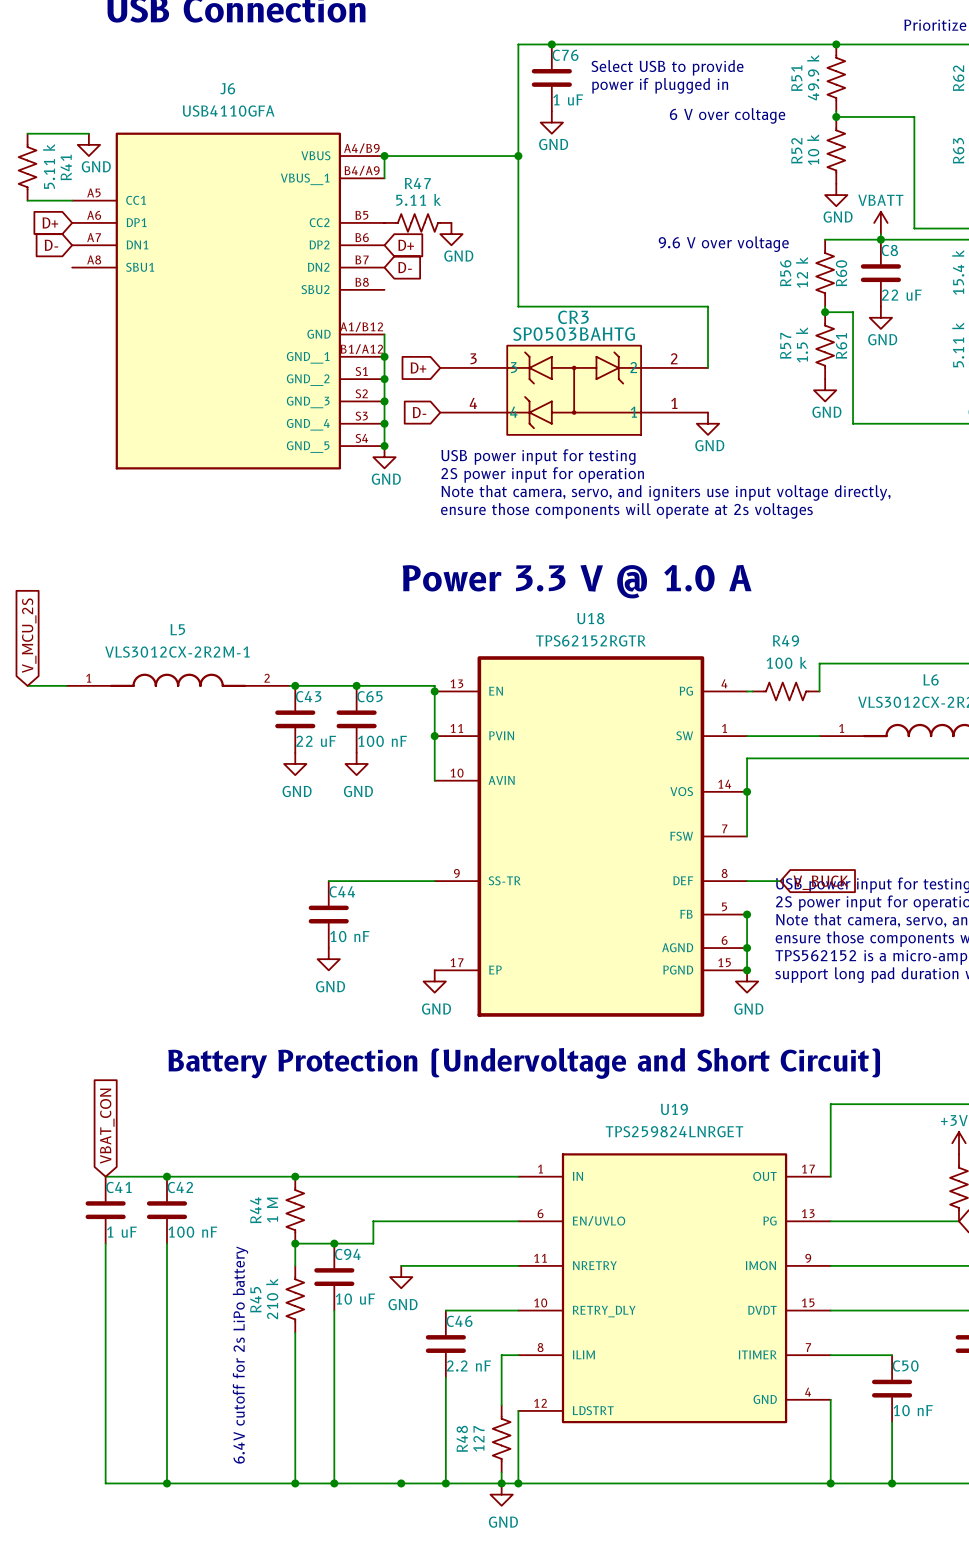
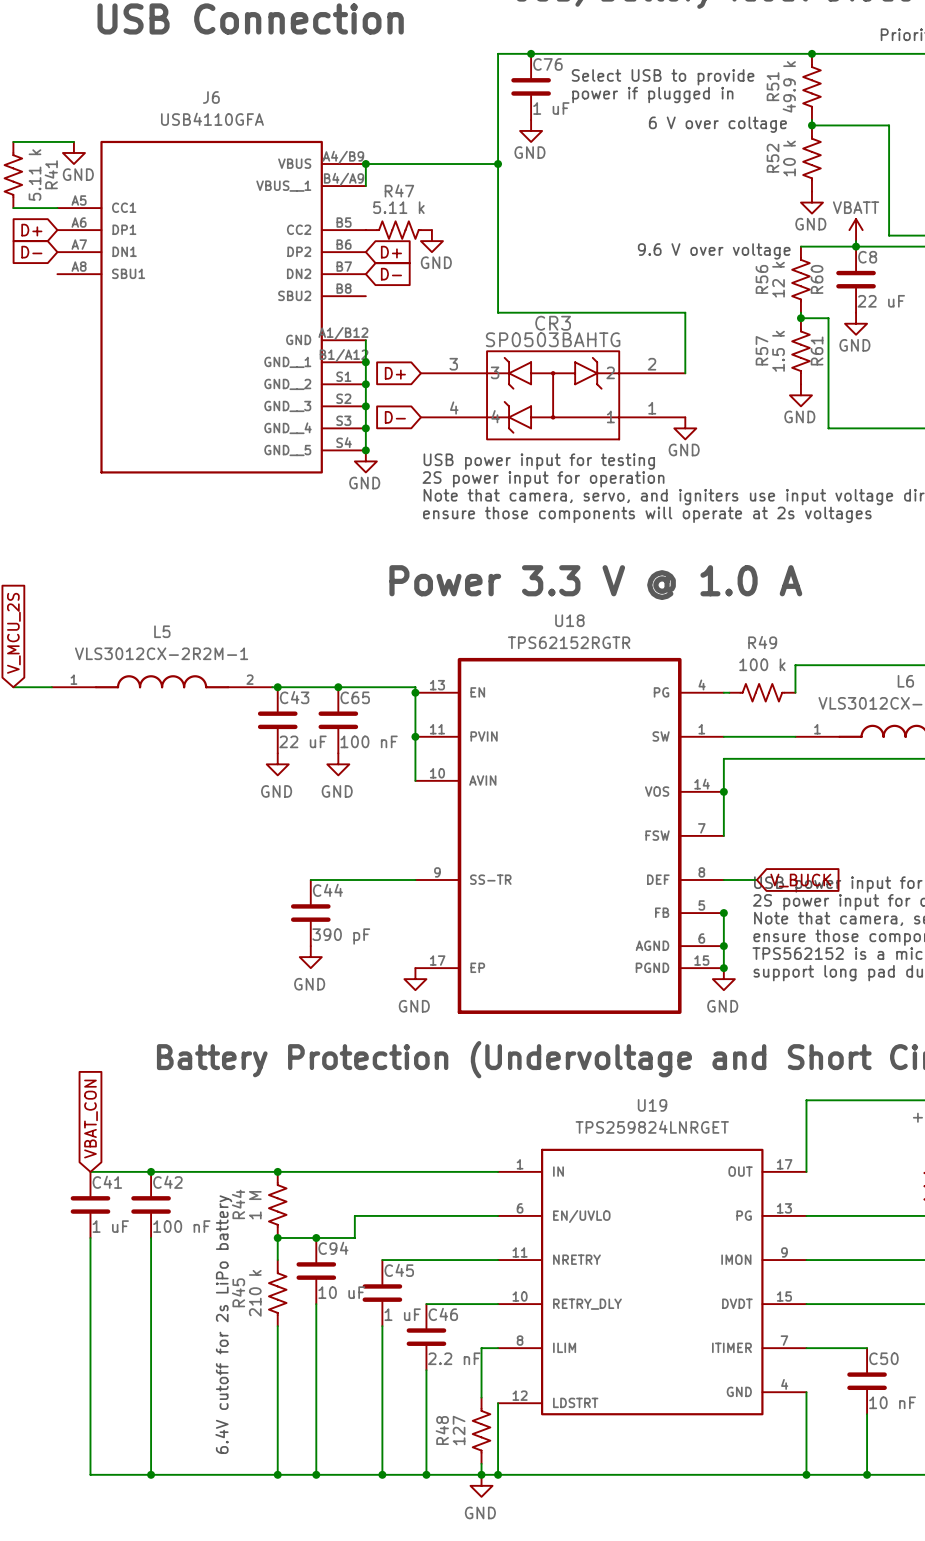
C44 value: 10 nF (349, 936) -> 390 pF (341, 936)
power symbol: GND (401, 1277) -> none
C45: none -> 1 uF (382, 1293)
wire: none -> (382, 1326) (382, 1474)

